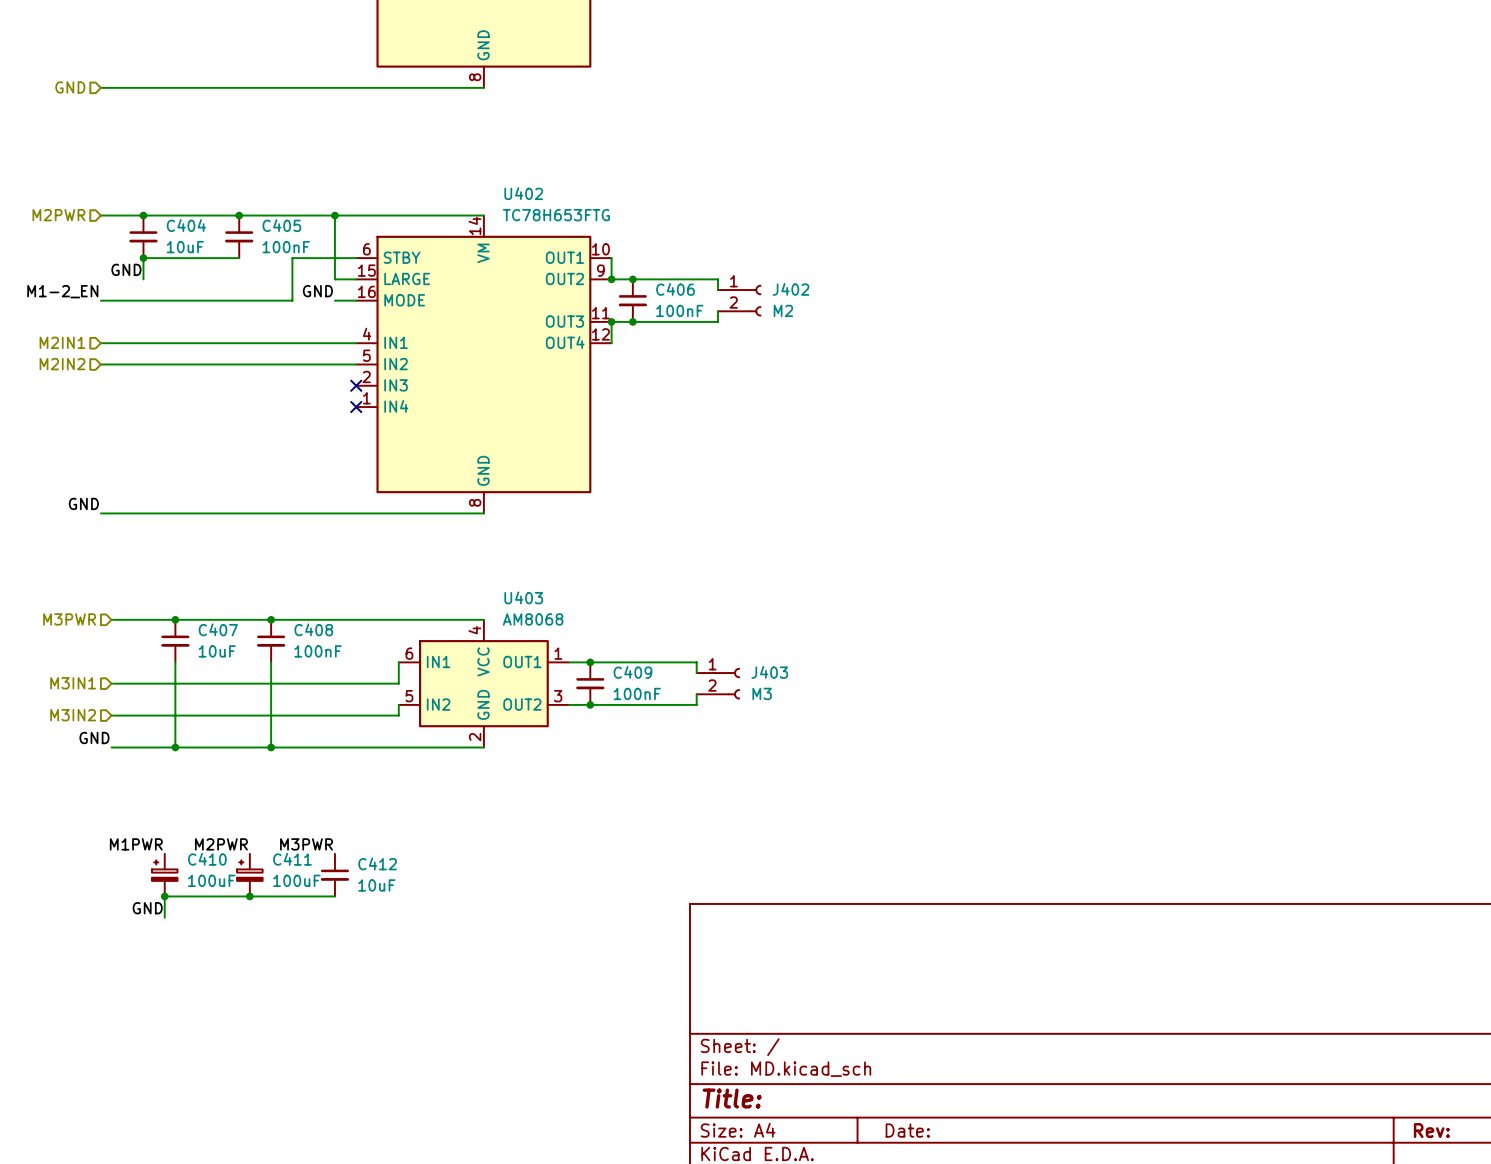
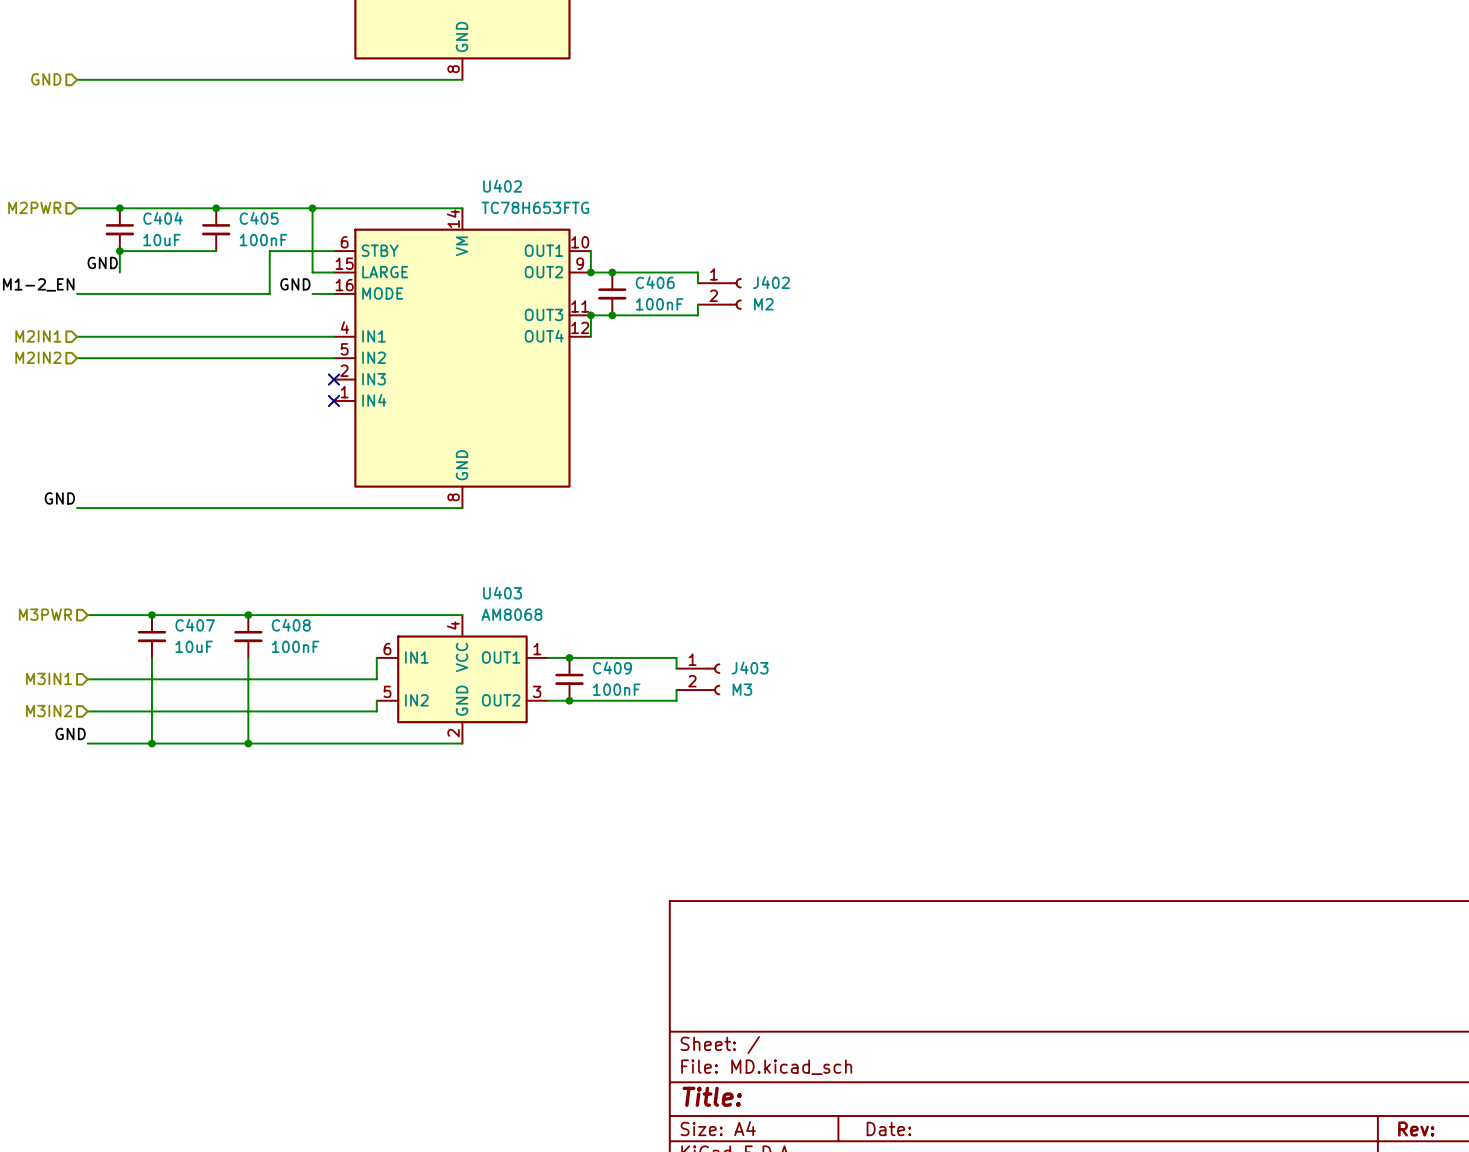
label: M1PWR (136, 844) -> none
label: M2PWR (221, 844) -> none
label: M3PWR (306, 844) -> none
C410: 100uF (164, 875) -> none
C411: 100uF (249, 875) -> none
C412: 10uF (334, 875) -> none
junction: (164, 896) -> none
junction: (249, 896) -> none
wire: (334, 896) (164, 896) (164, 917) -> none
label: GND (147, 908) -> none

